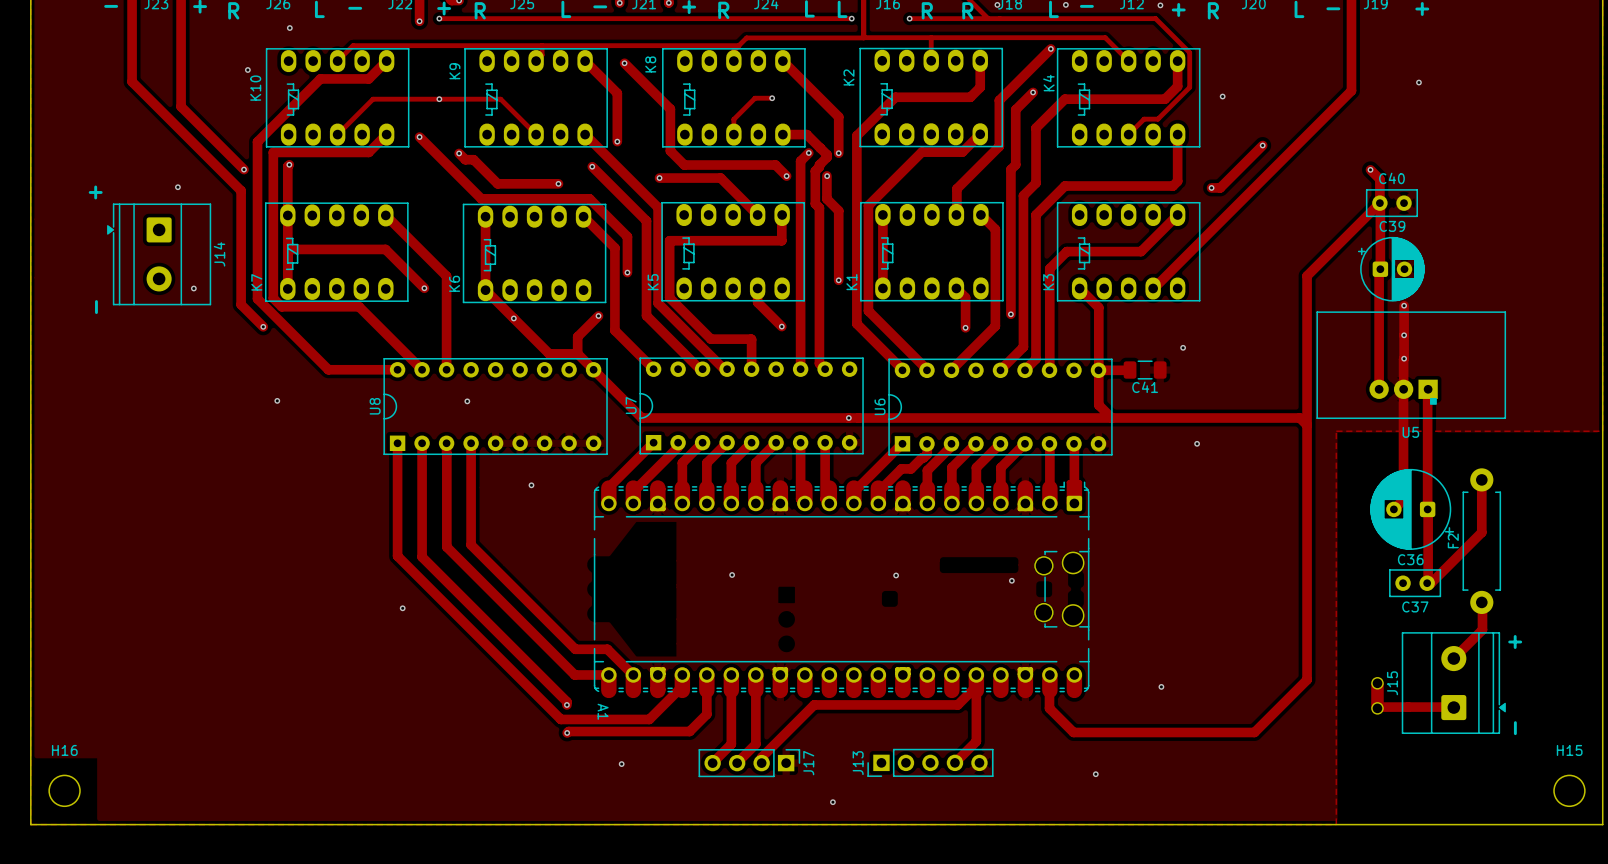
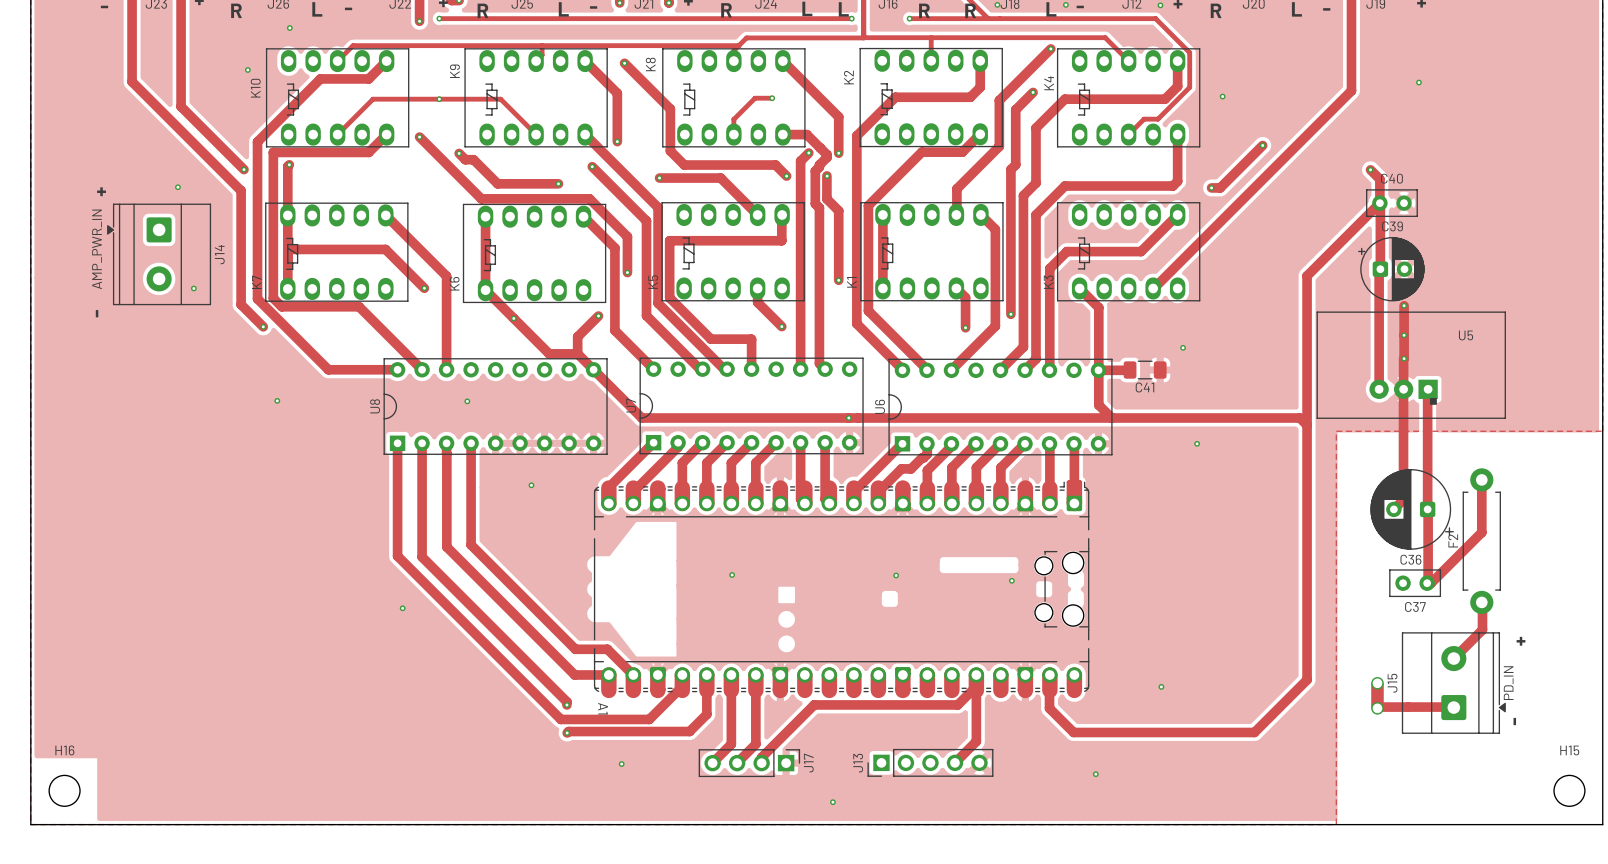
J14 value: none -> AMP_PWR_IN (97, 249)
U5 name position: U5 (1410, 432) -> U5 (1466, 335)
J15 value: none -> PD_IN (1508, 683)

